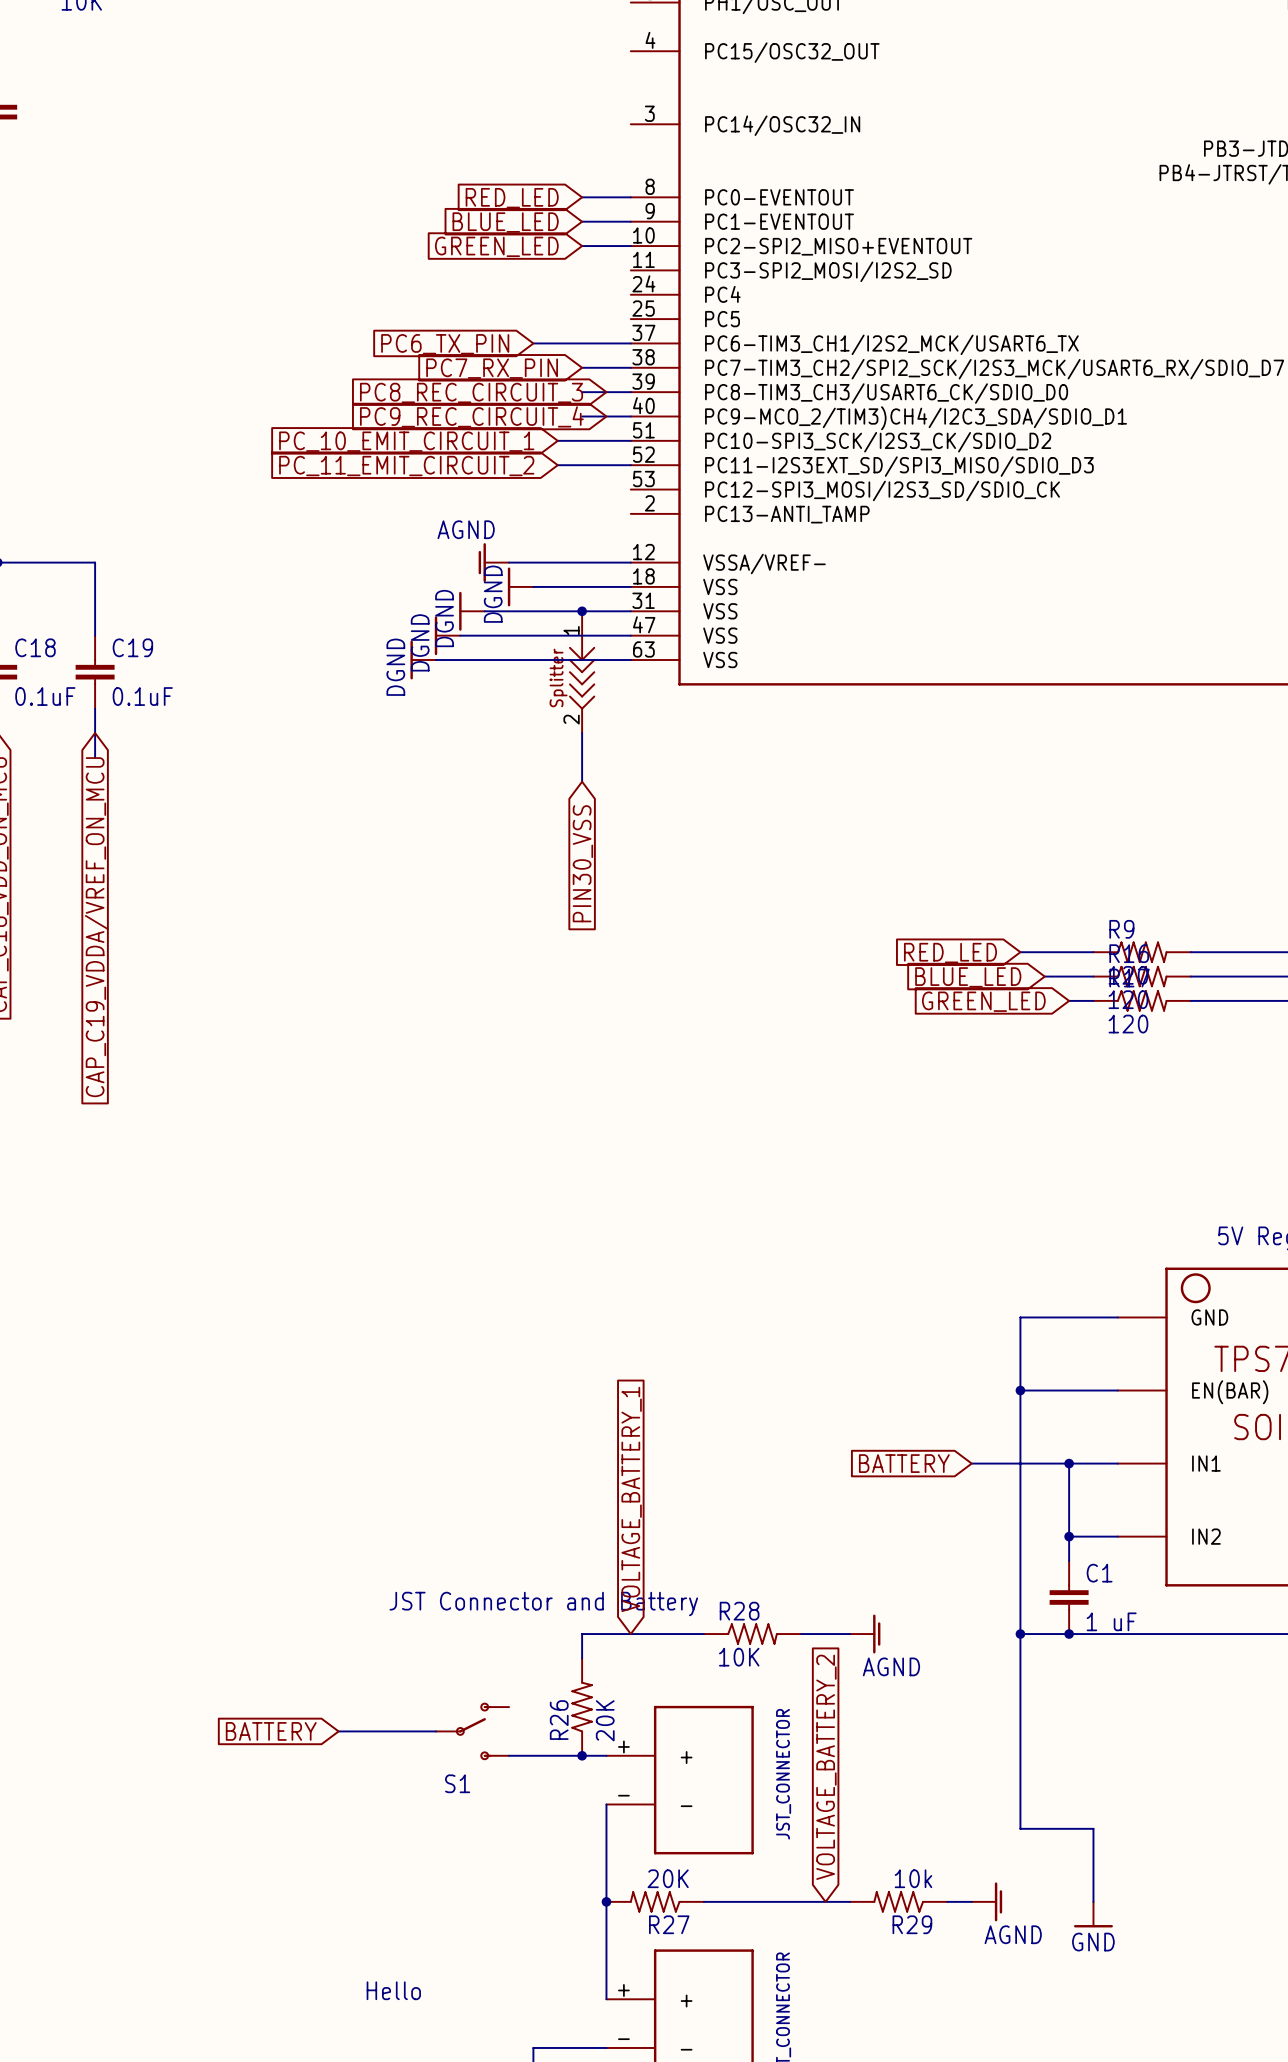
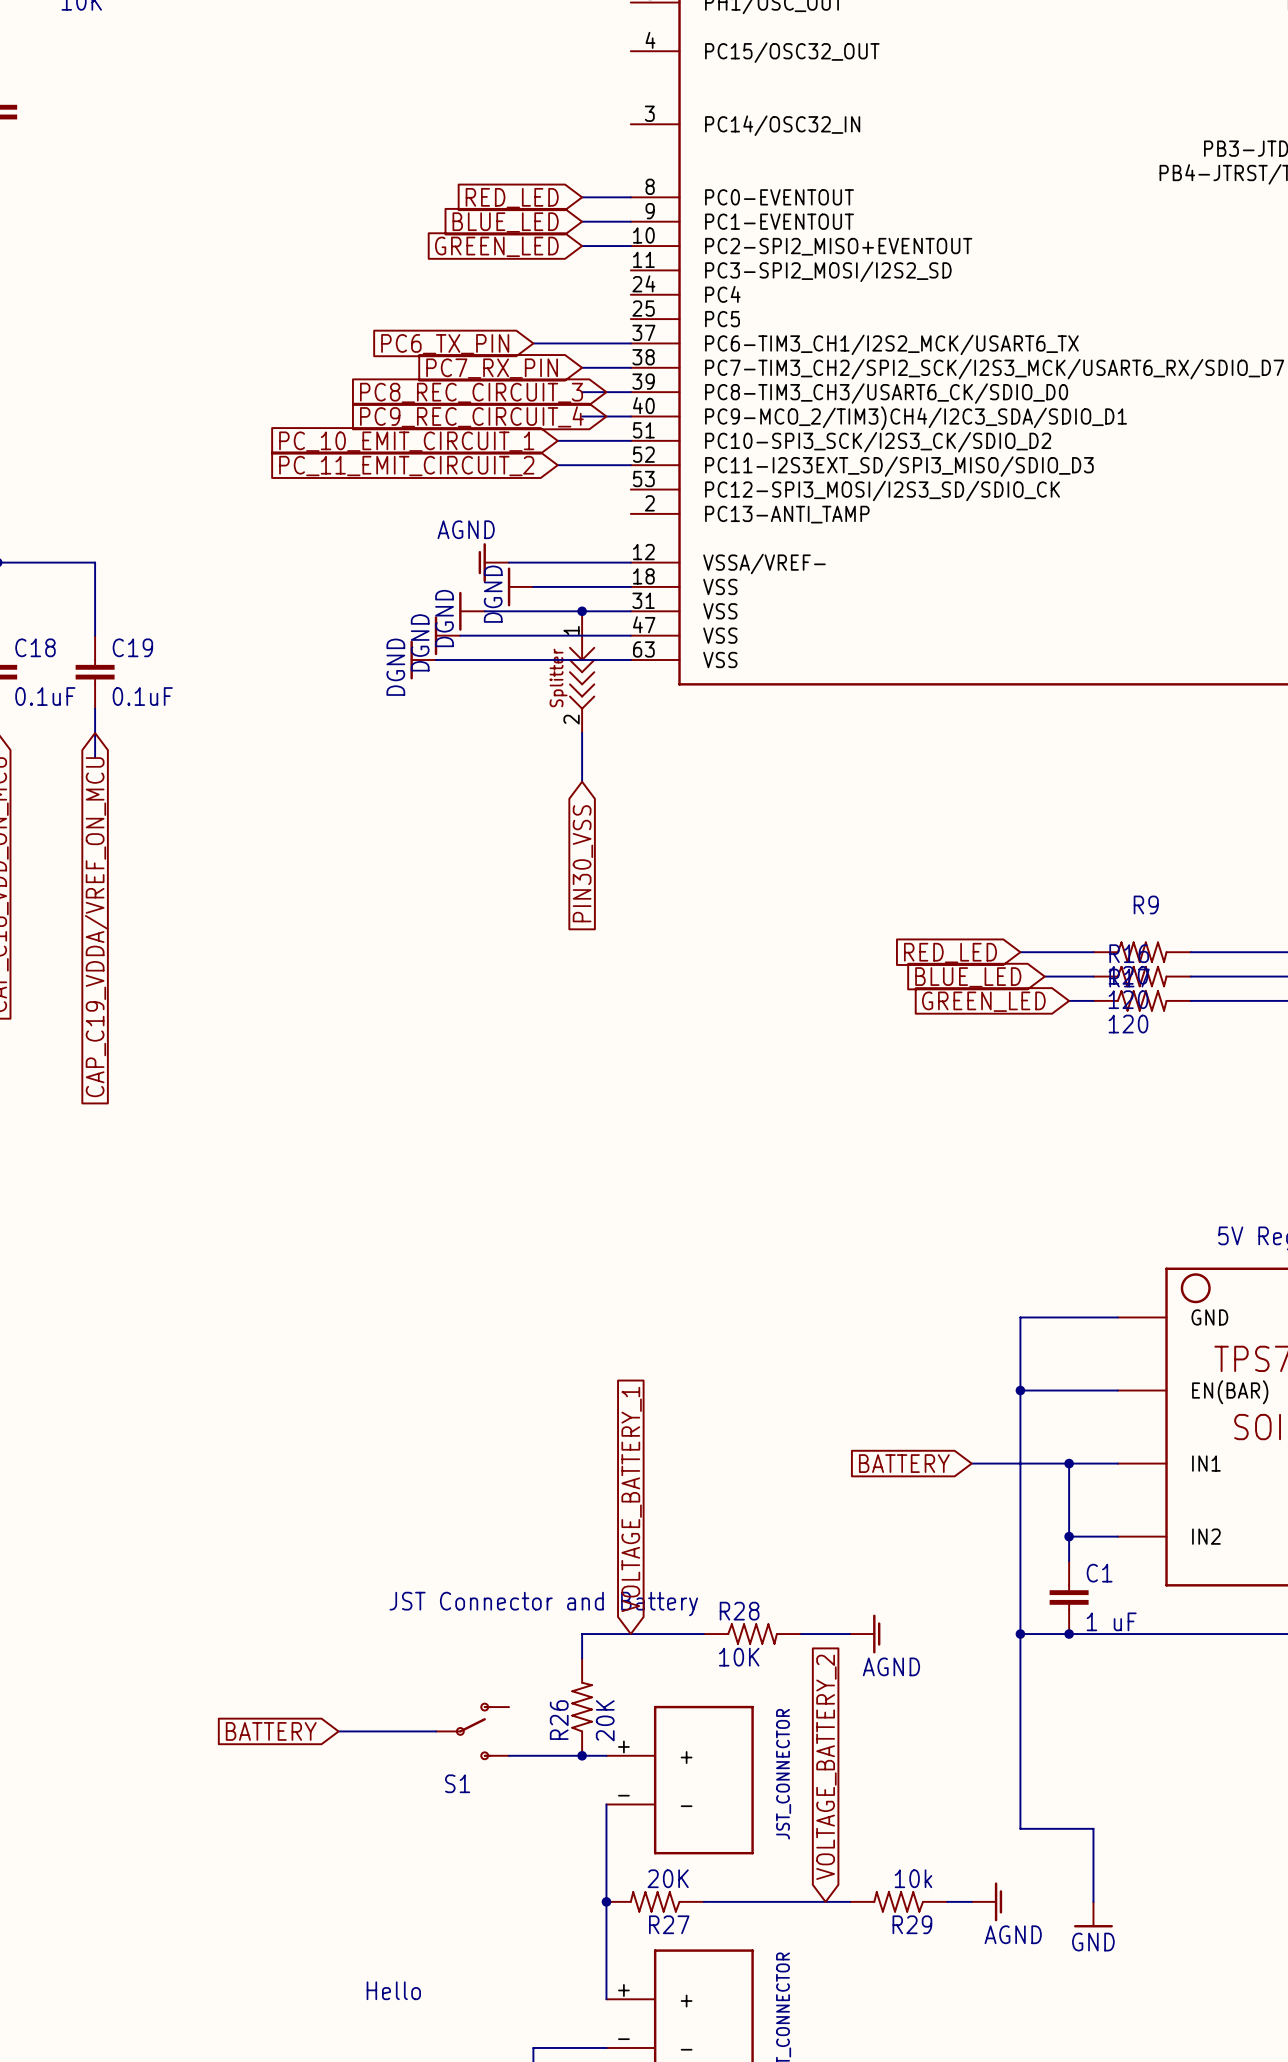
R9 name position: R9 (1121, 929) -> R9 (1146, 904)

